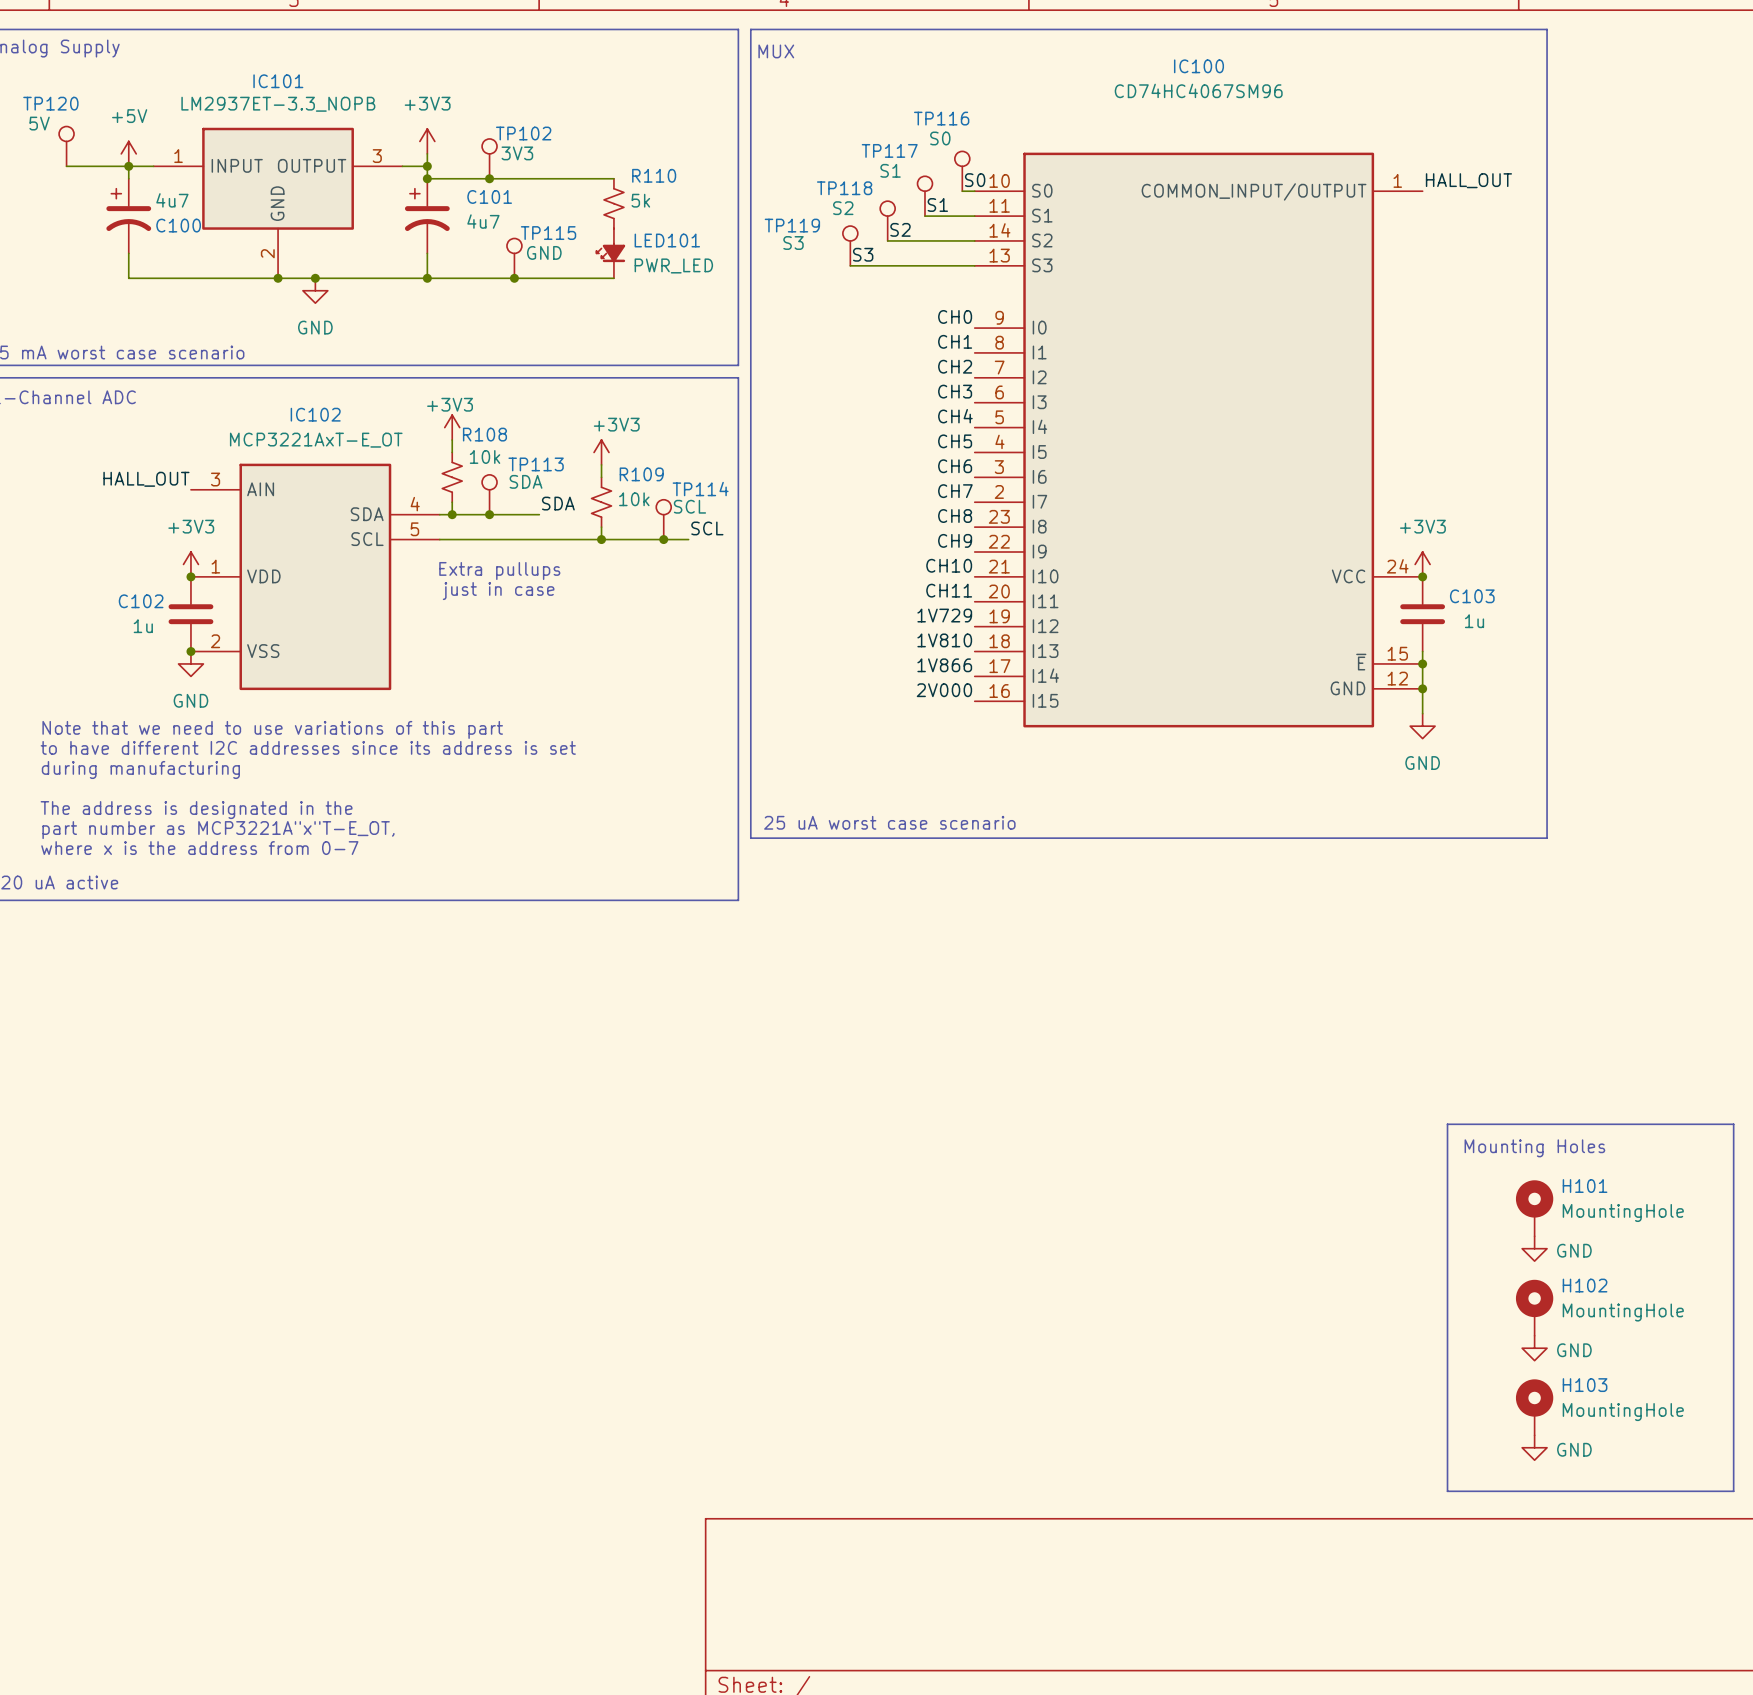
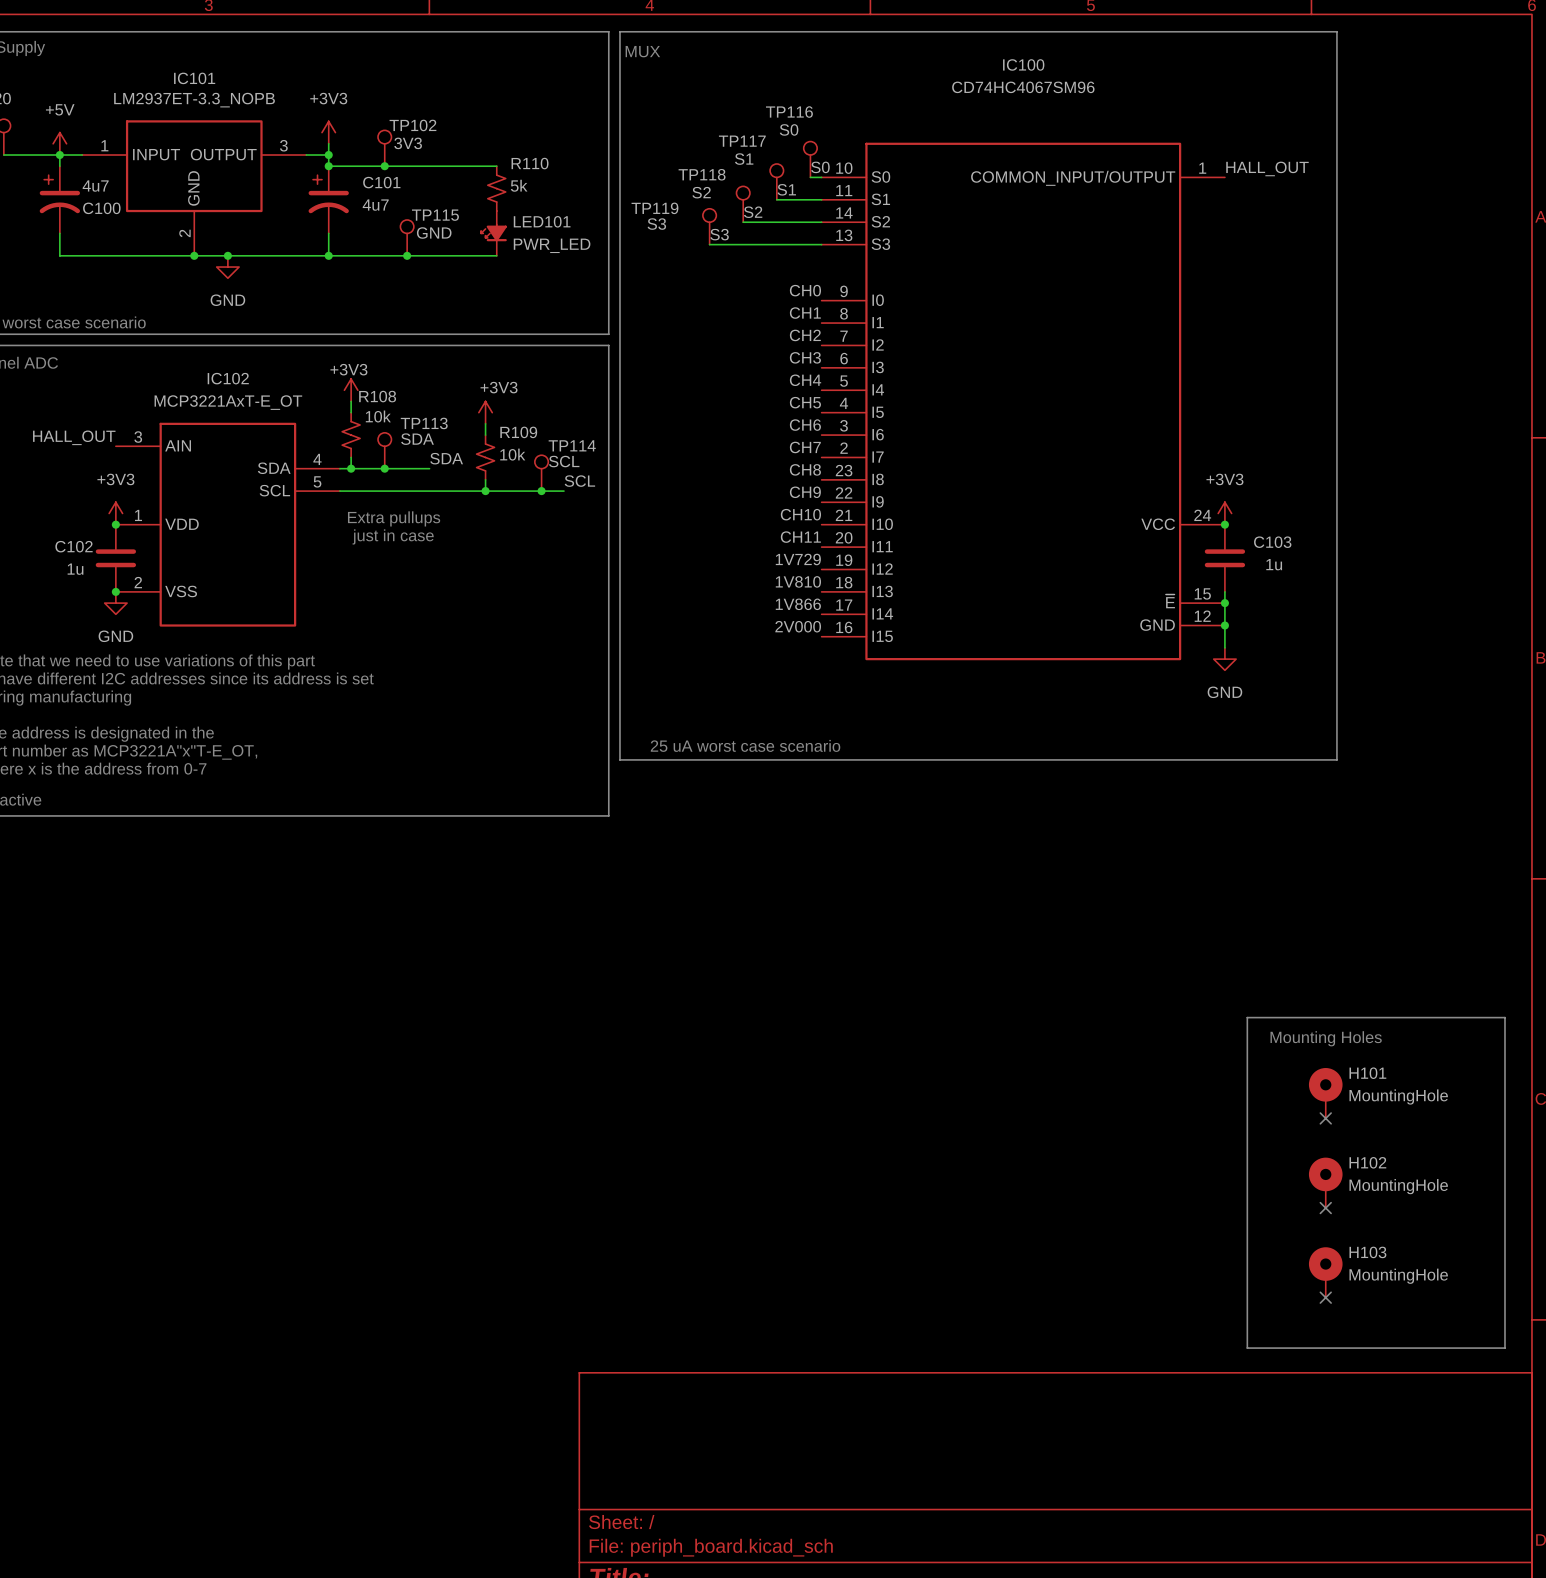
no-connect mark: none -> (1325, 1118)
power symbol: GND (1534, 1248) -> none
no-connect mark: none -> (1325, 1208)
power symbol: GND (1534, 1348) -> none
no-connect mark: none -> (1325, 1297)
power symbol: GND (1534, 1447) -> none

